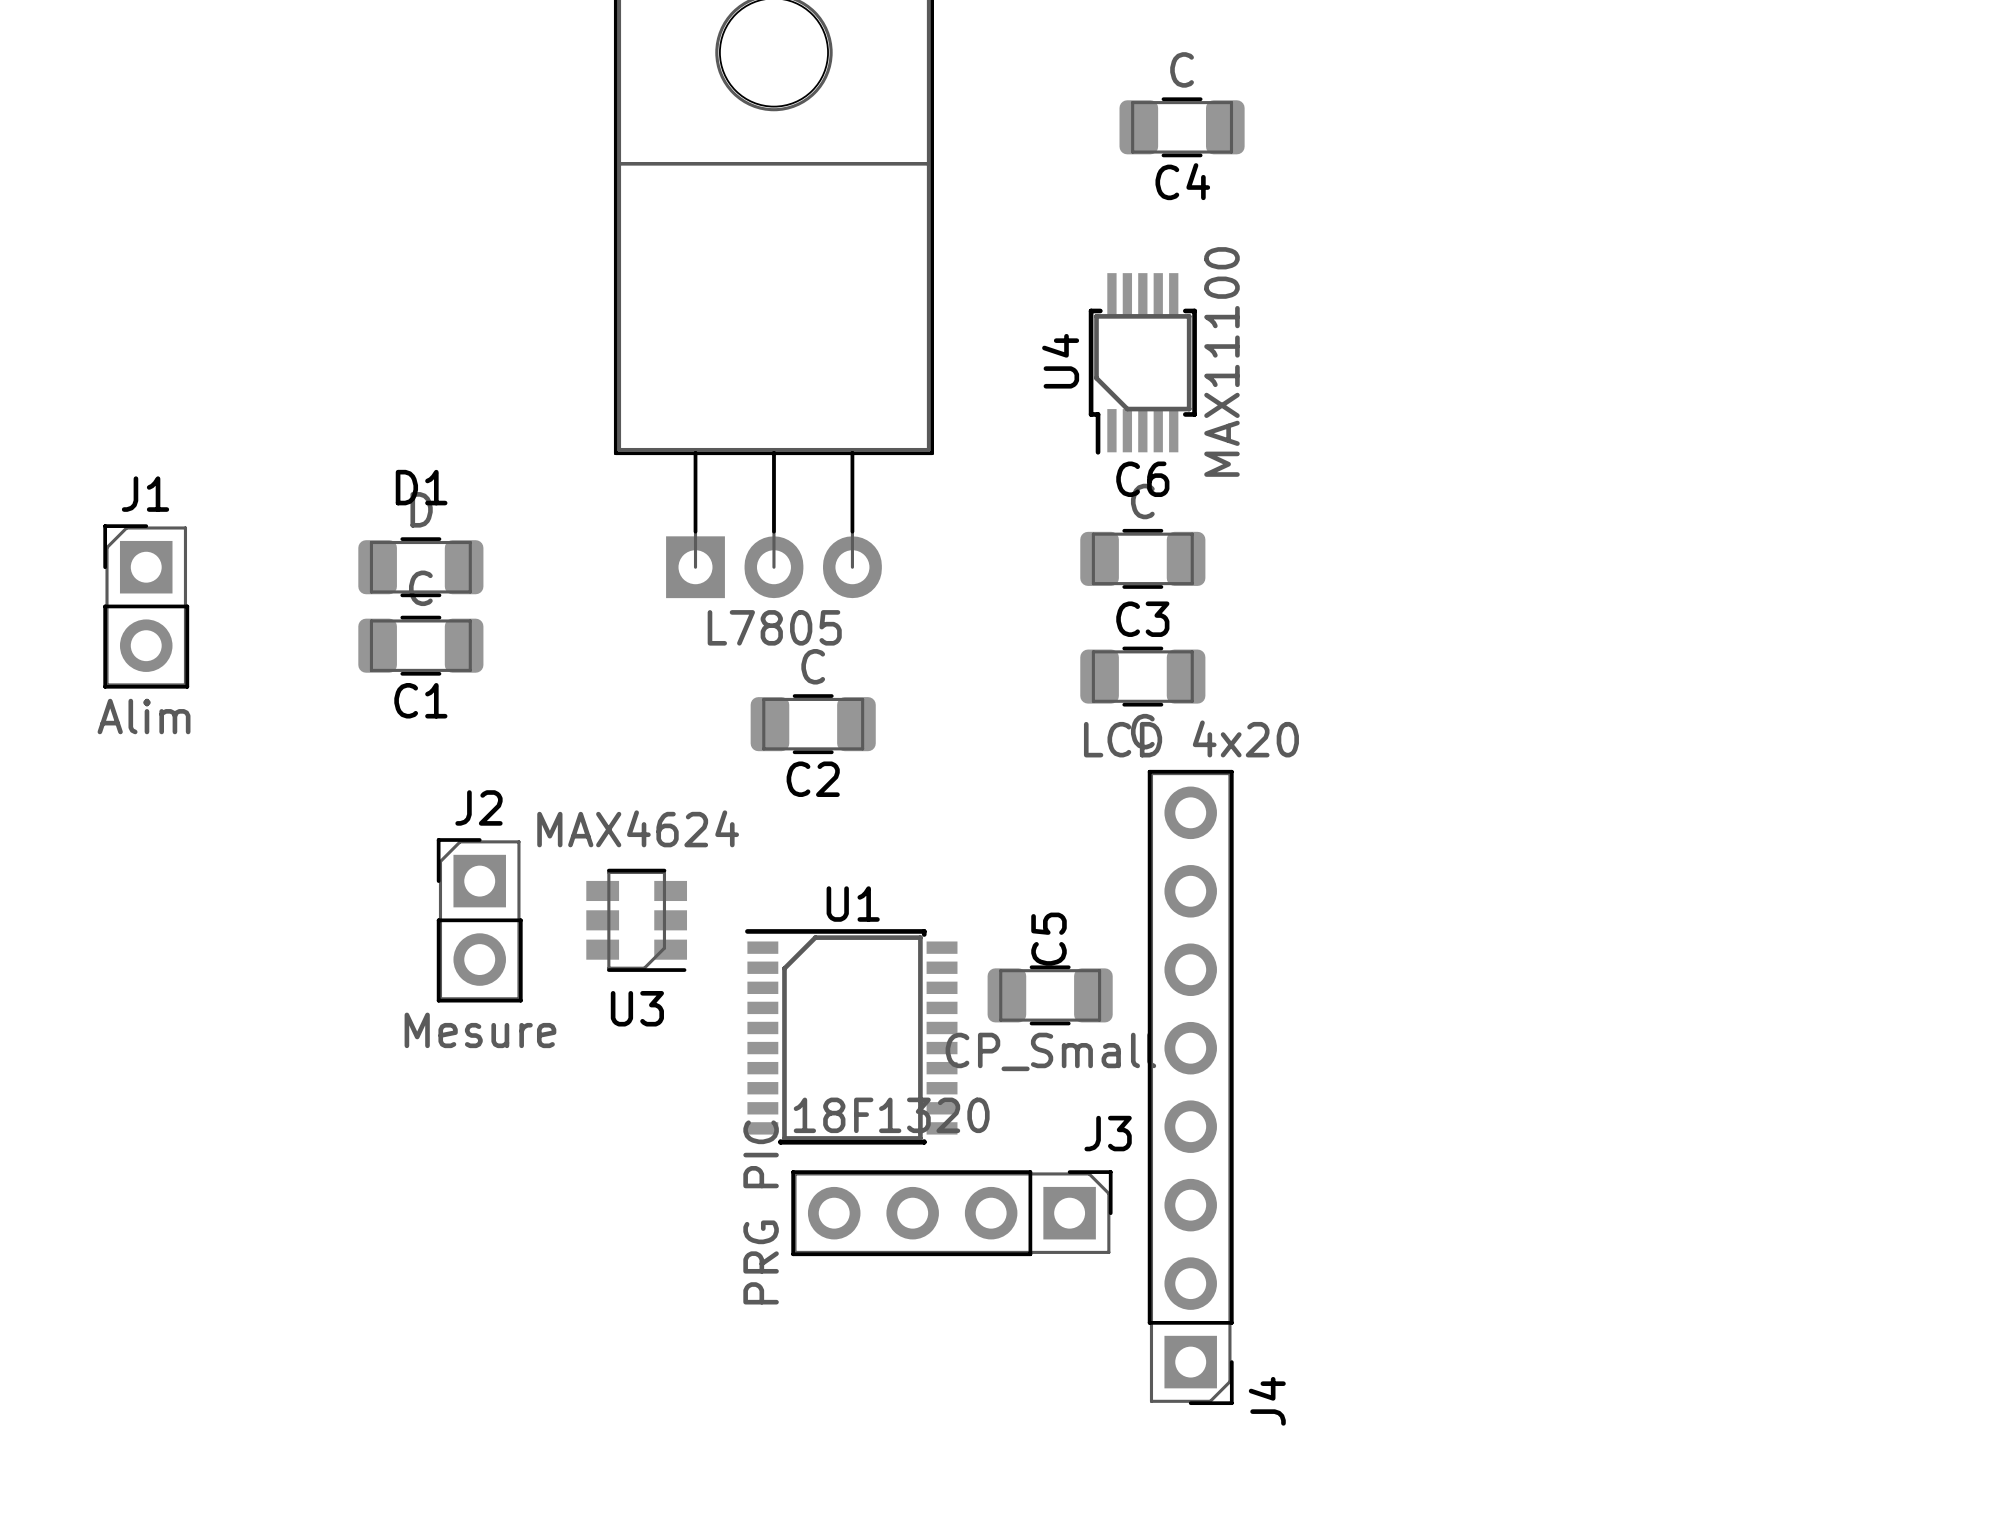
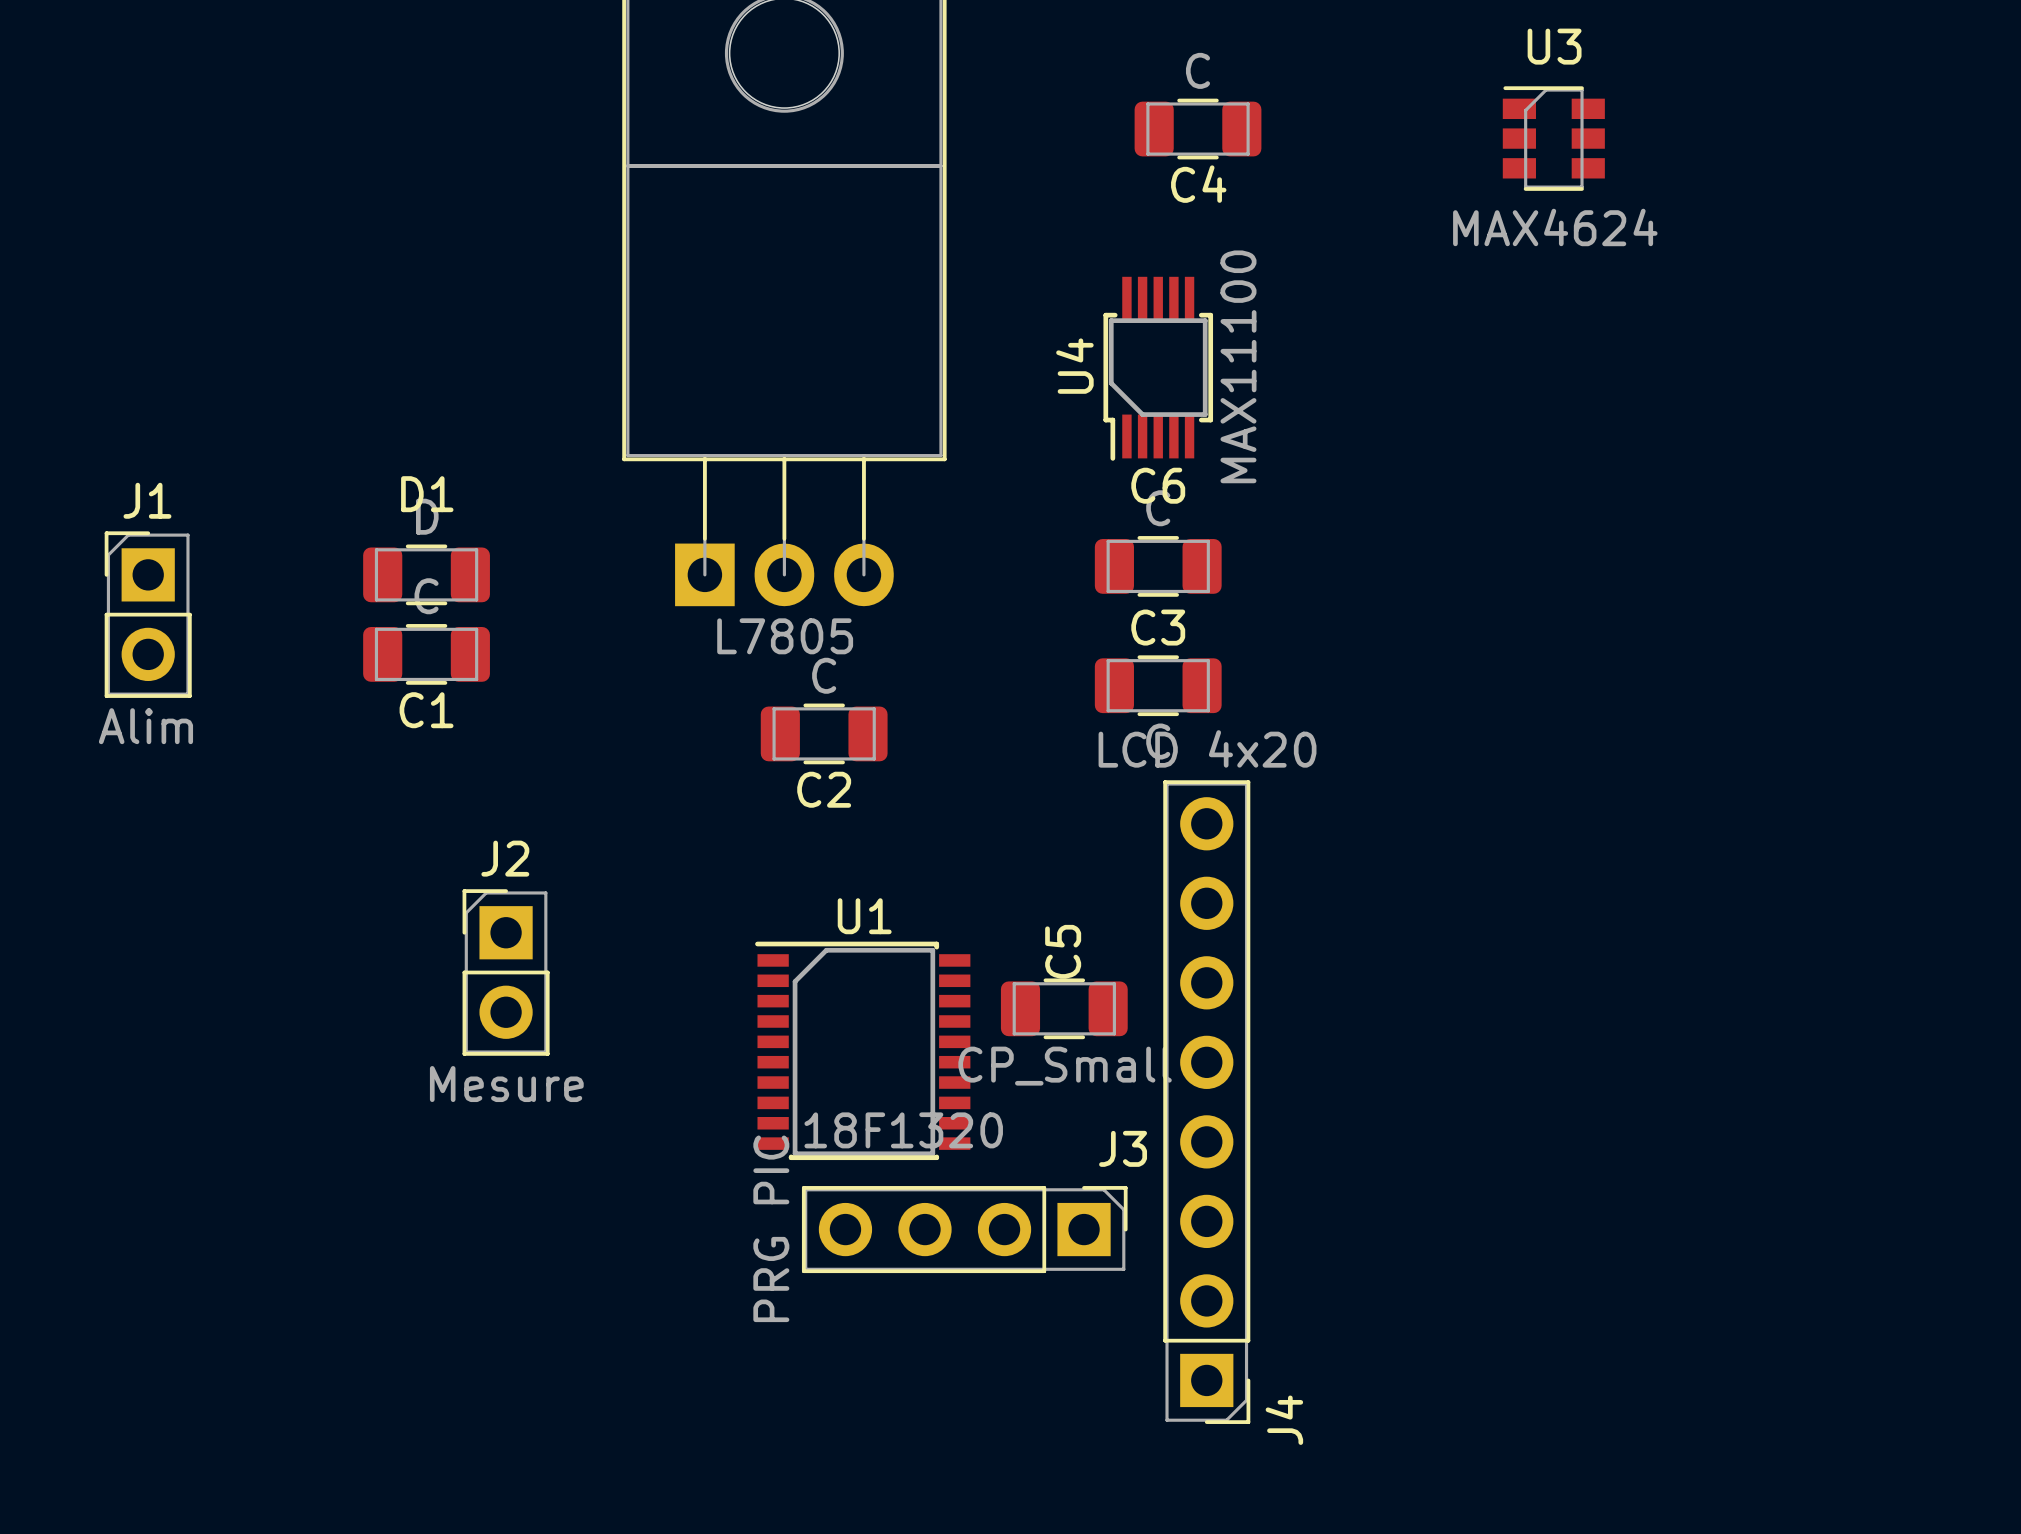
J2 position: (479, 920) -> (506, 972)
U3 rotation: 0° (636, 920) -> 180° (1553, 138)
U3 position: (636, 920) -> (1553, 138)

